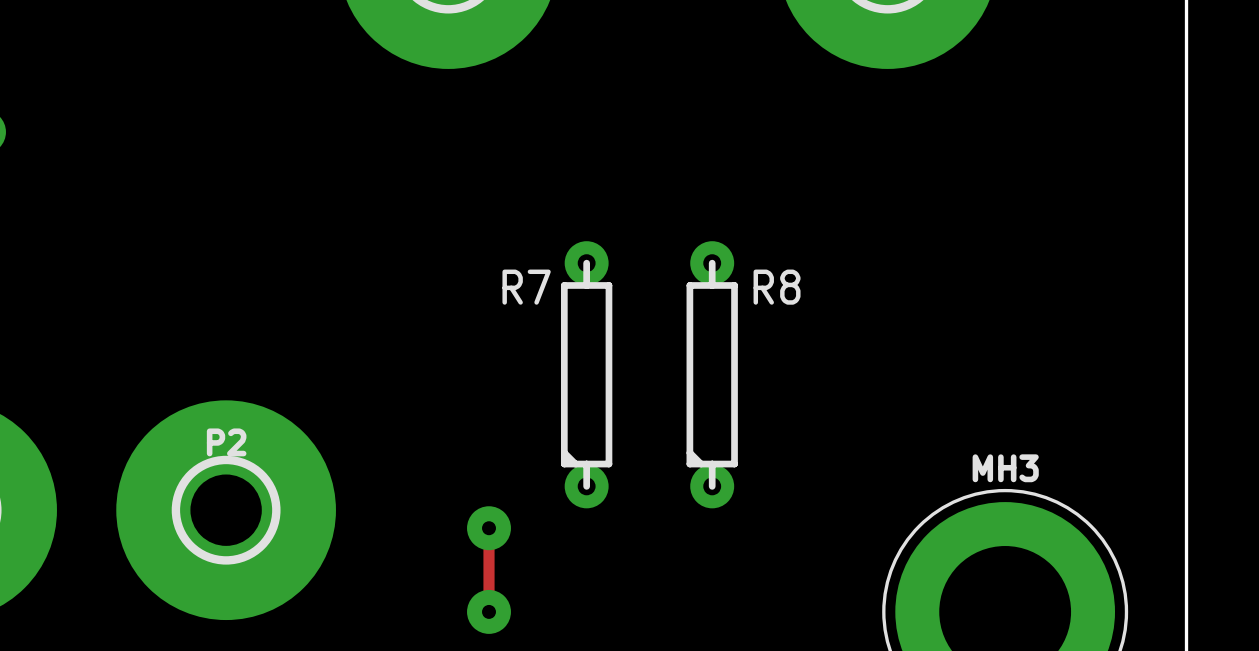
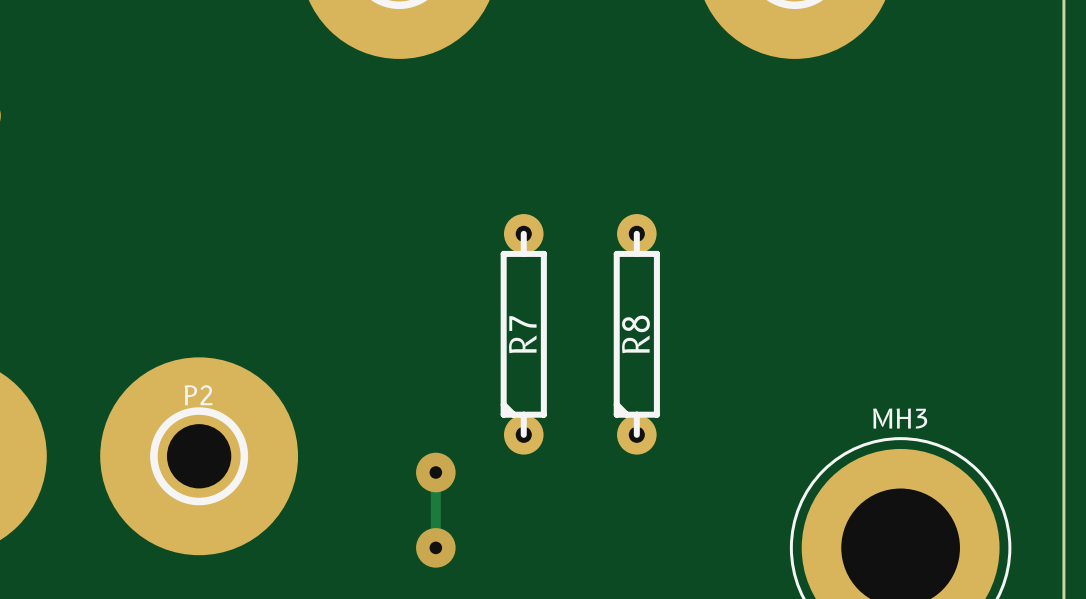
R7 name rotation: 0° (526, 287) -> 90° counterclockwise (522, 334)
R7 name position: R7 (526, 287) -> R7 (522, 334)
R8 name rotation: 0° (777, 287) -> 90° counterclockwise (635, 334)
R8 name position: R8 (777, 287) -> R8 (635, 334)

